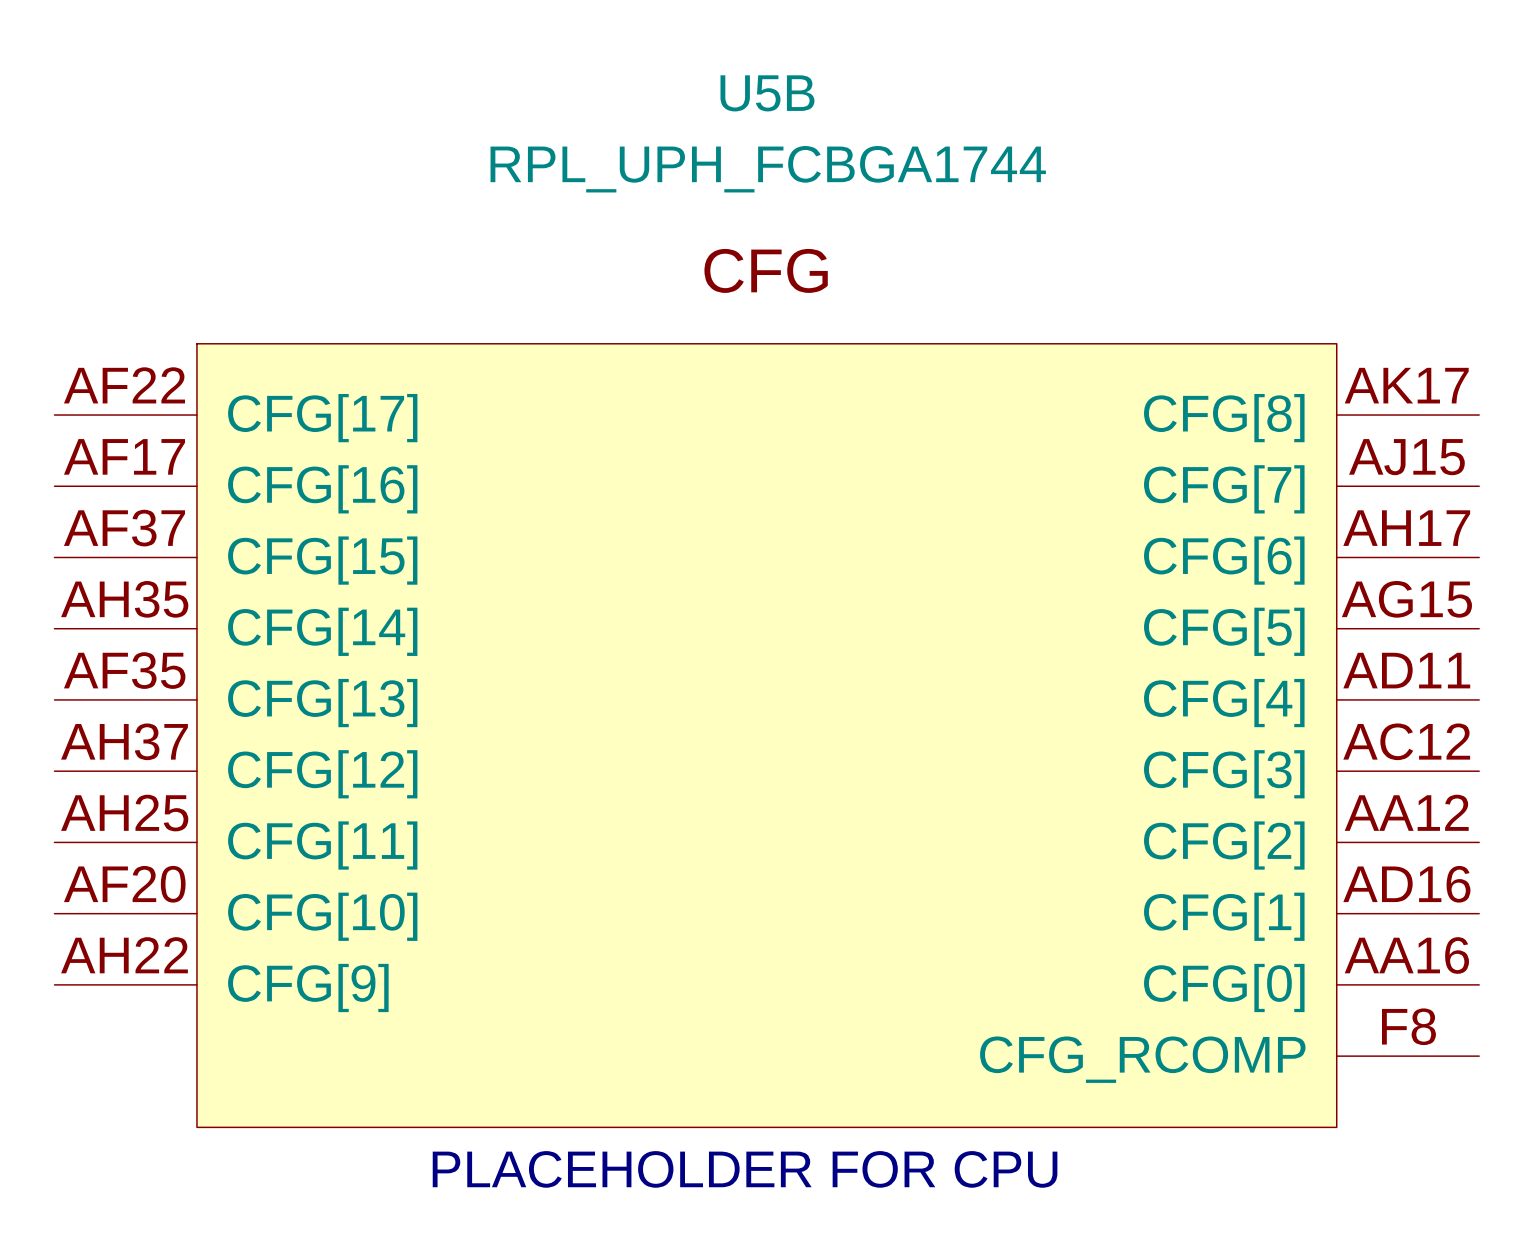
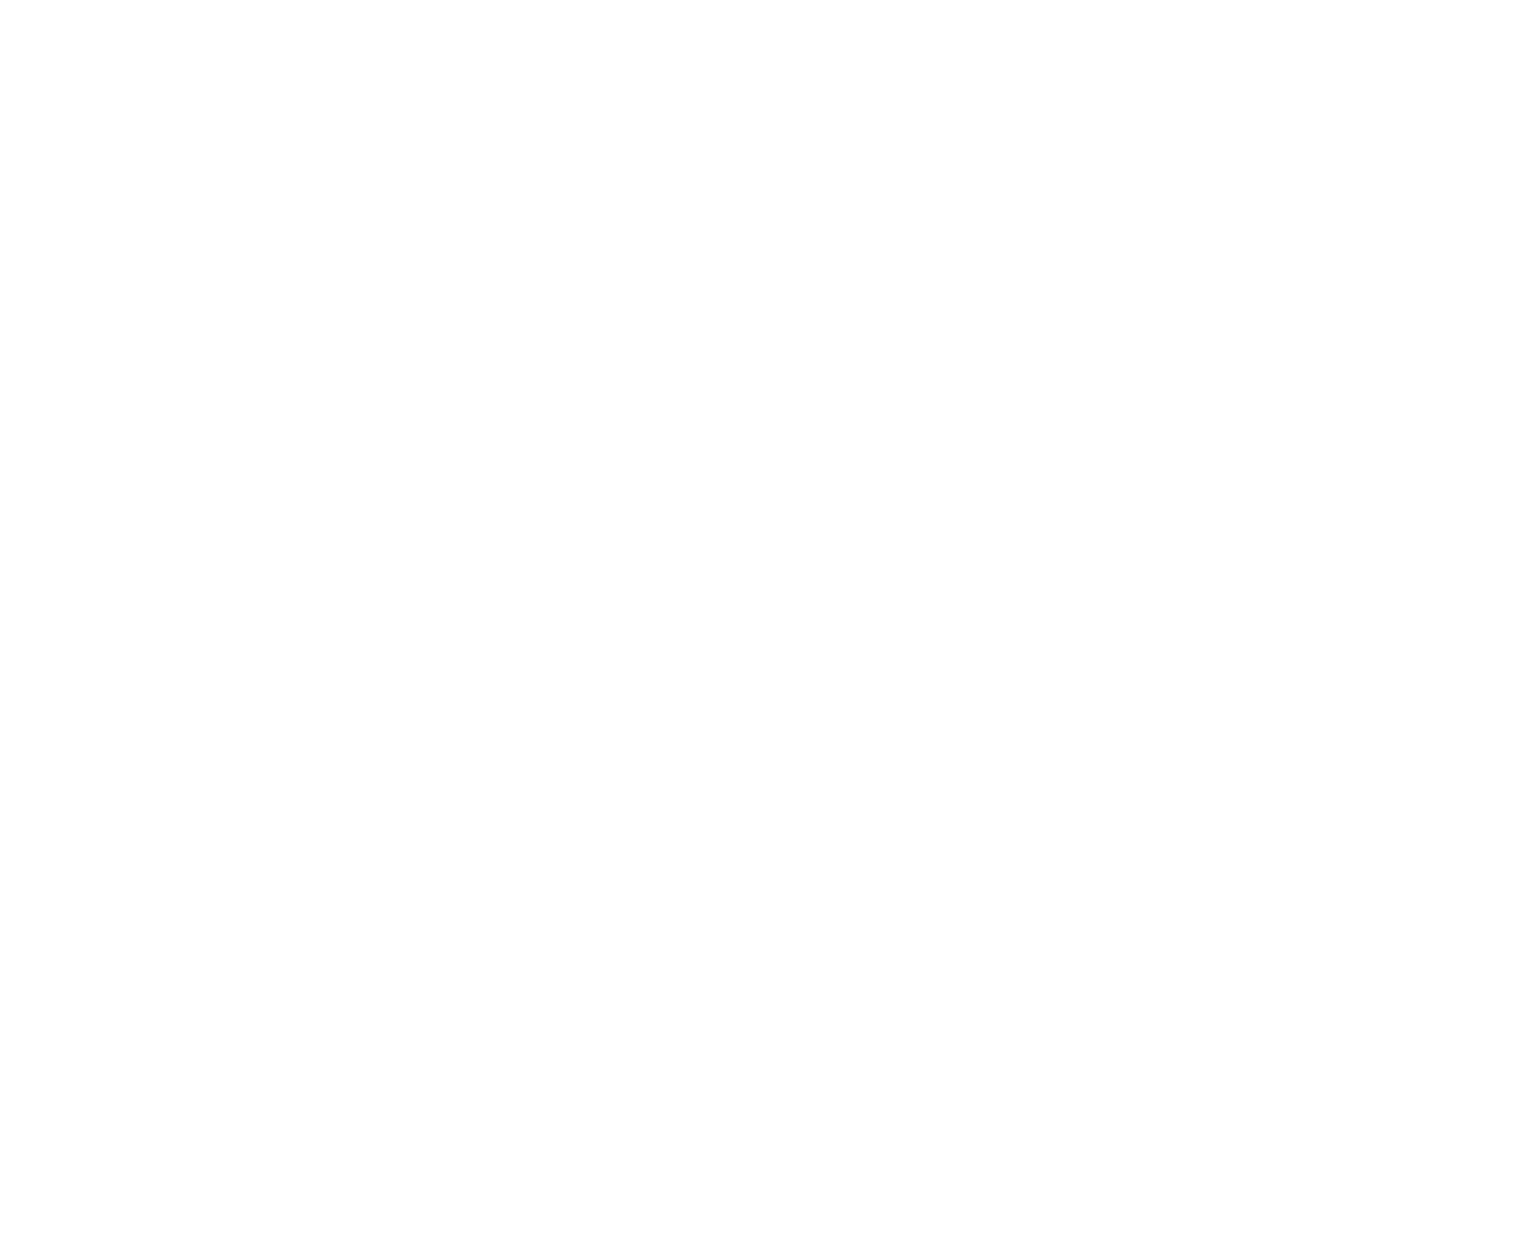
U5B: RPL_UPH_FCBGA1744 (766, 735) -> none
text: PLACEHOLDER FOR CPU (745, 1169) -> none

